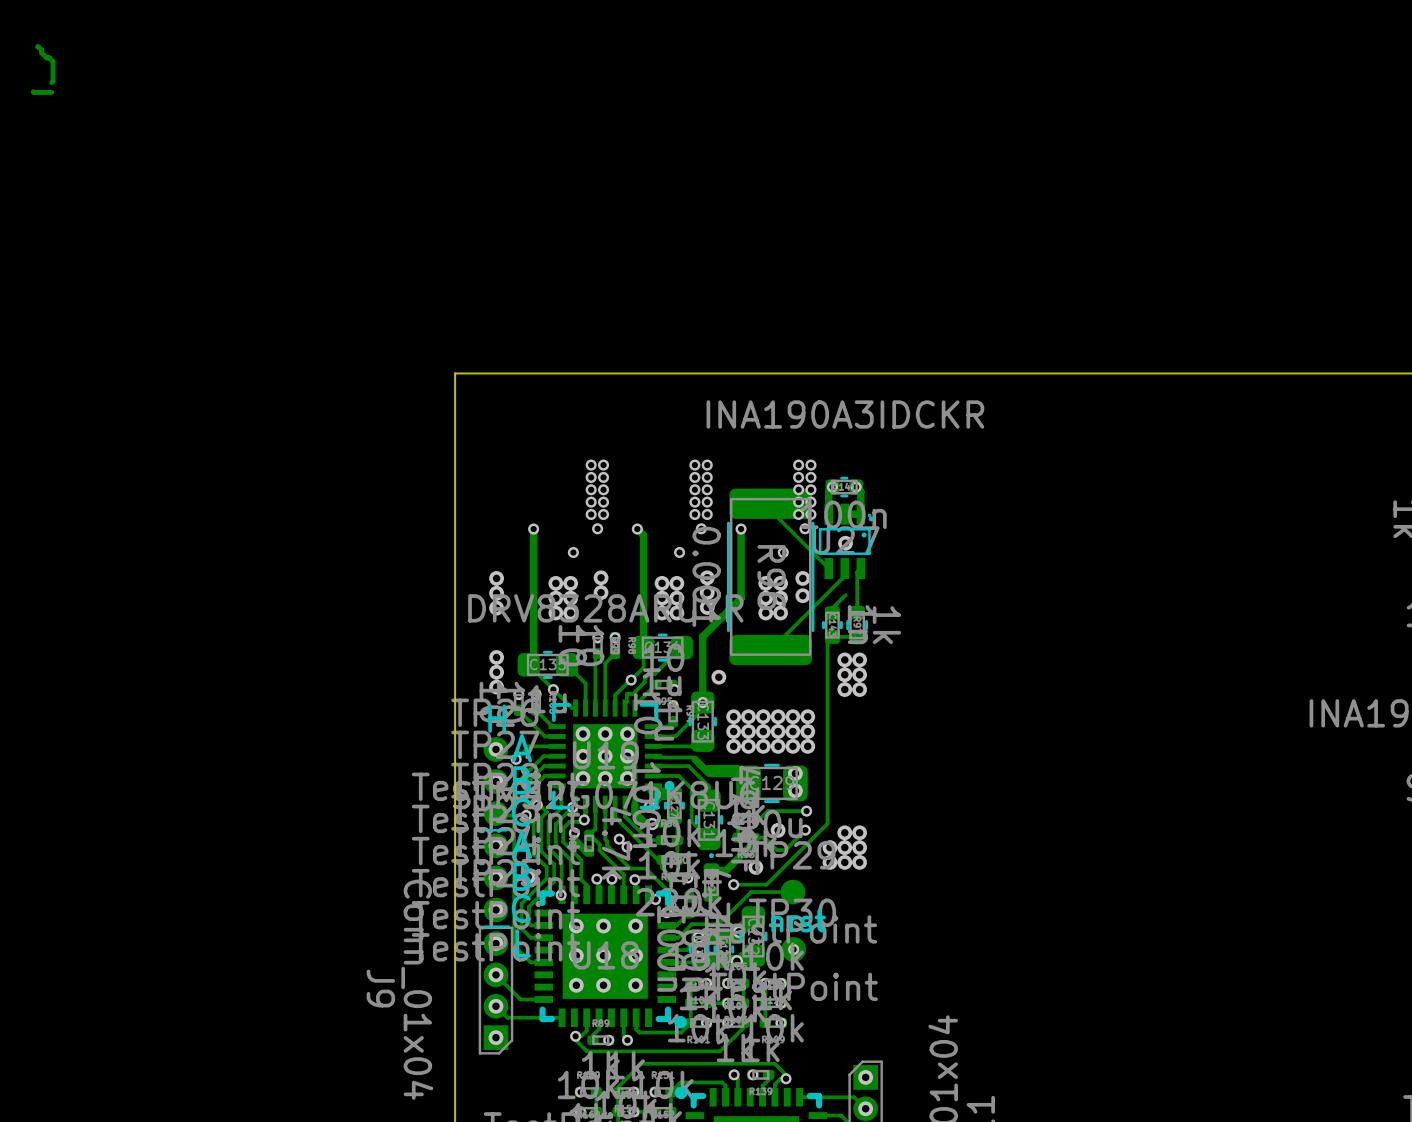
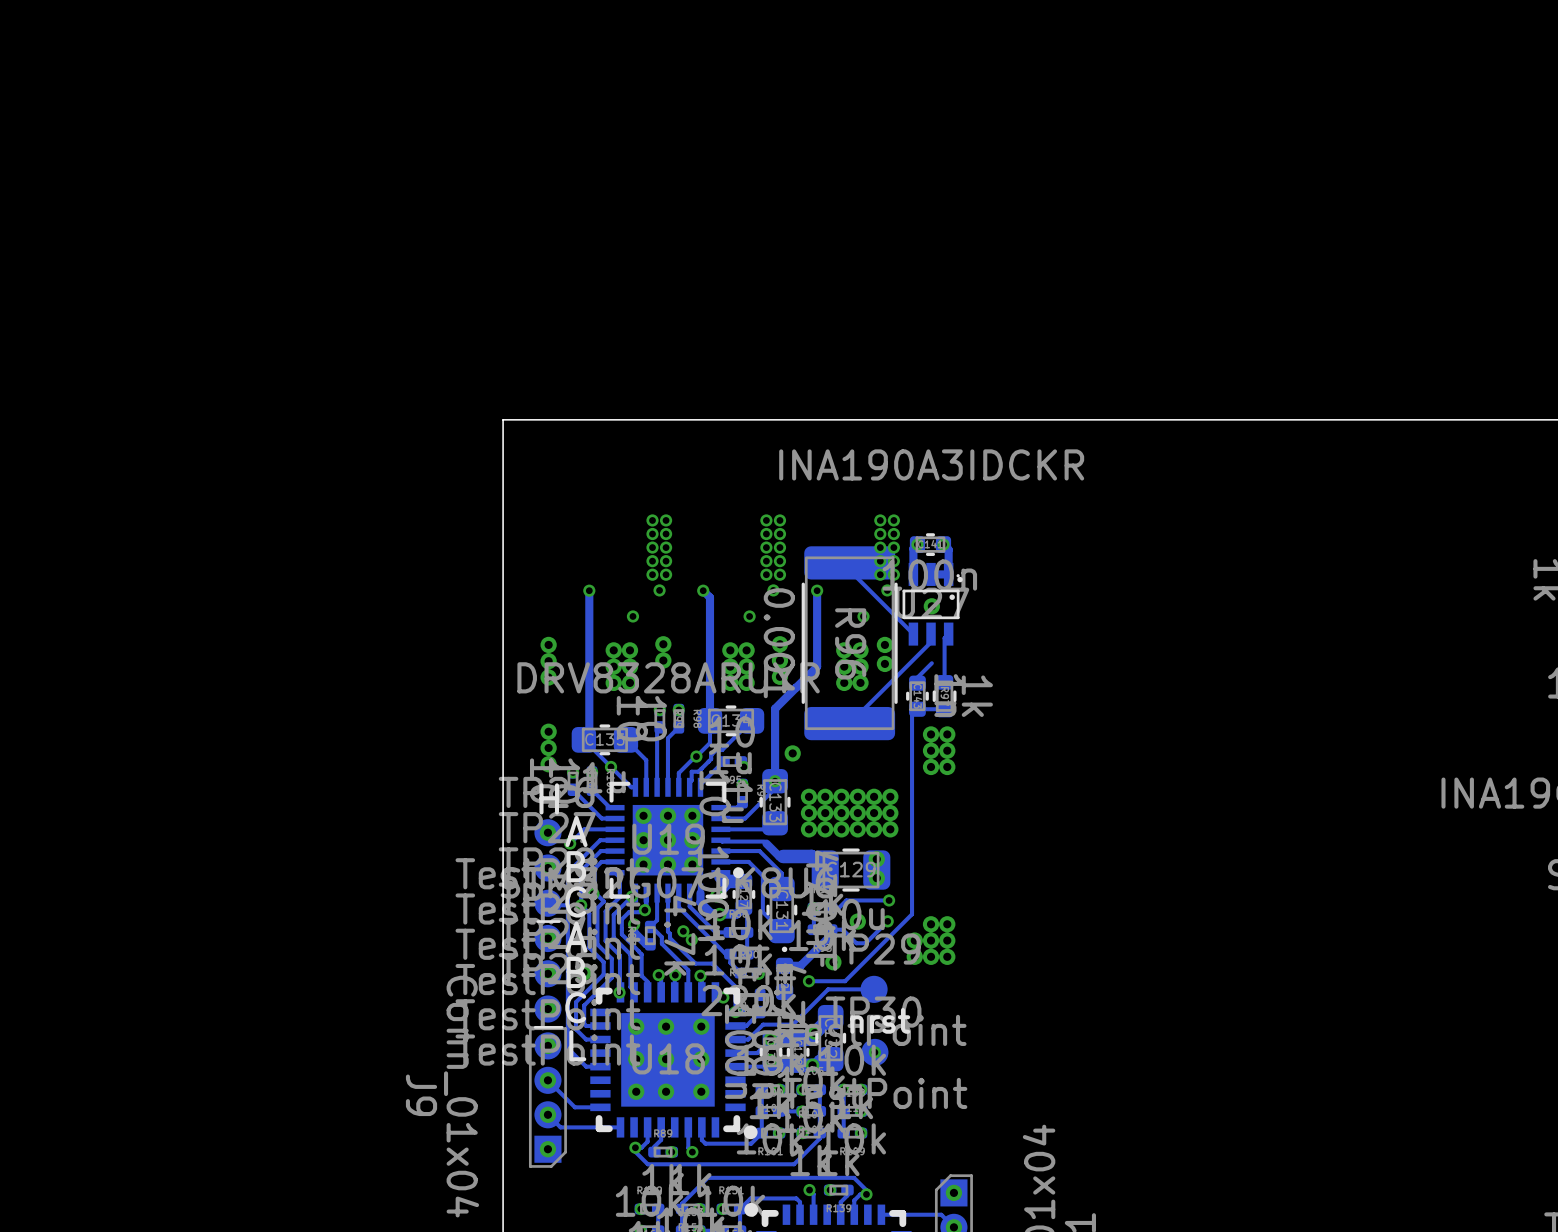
track: (38, 46) (41, 52) (53, 61) (51, 82) -> none
track: (33, 91) (51, 92) -> none

